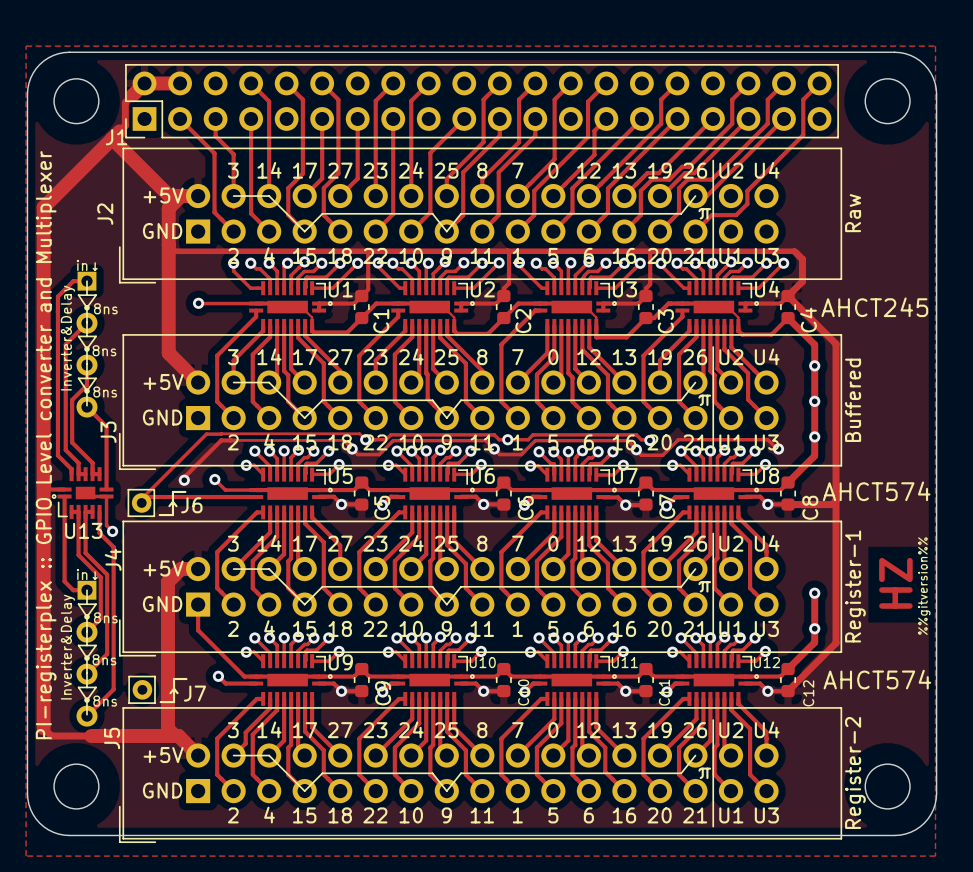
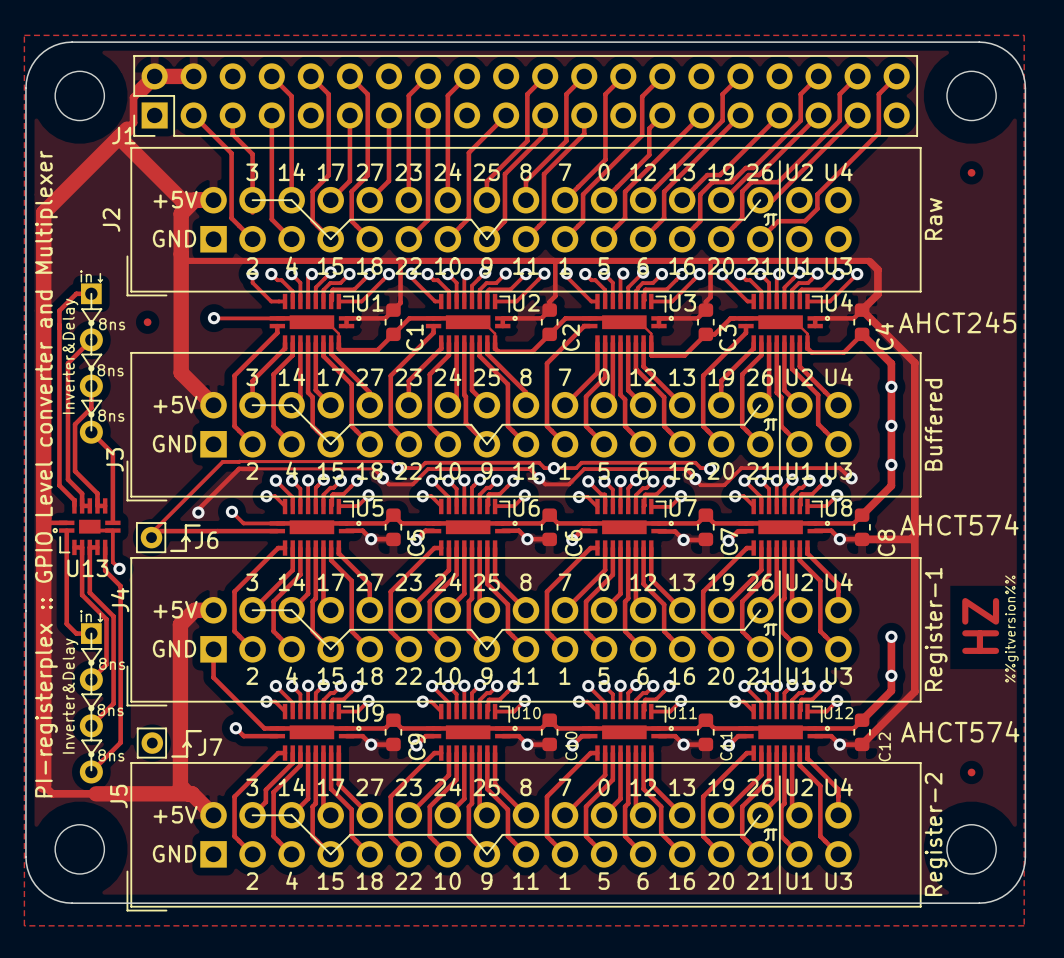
part: none -> (971, 172)
part: none -> (147, 322)
part: none -> (971, 772)

